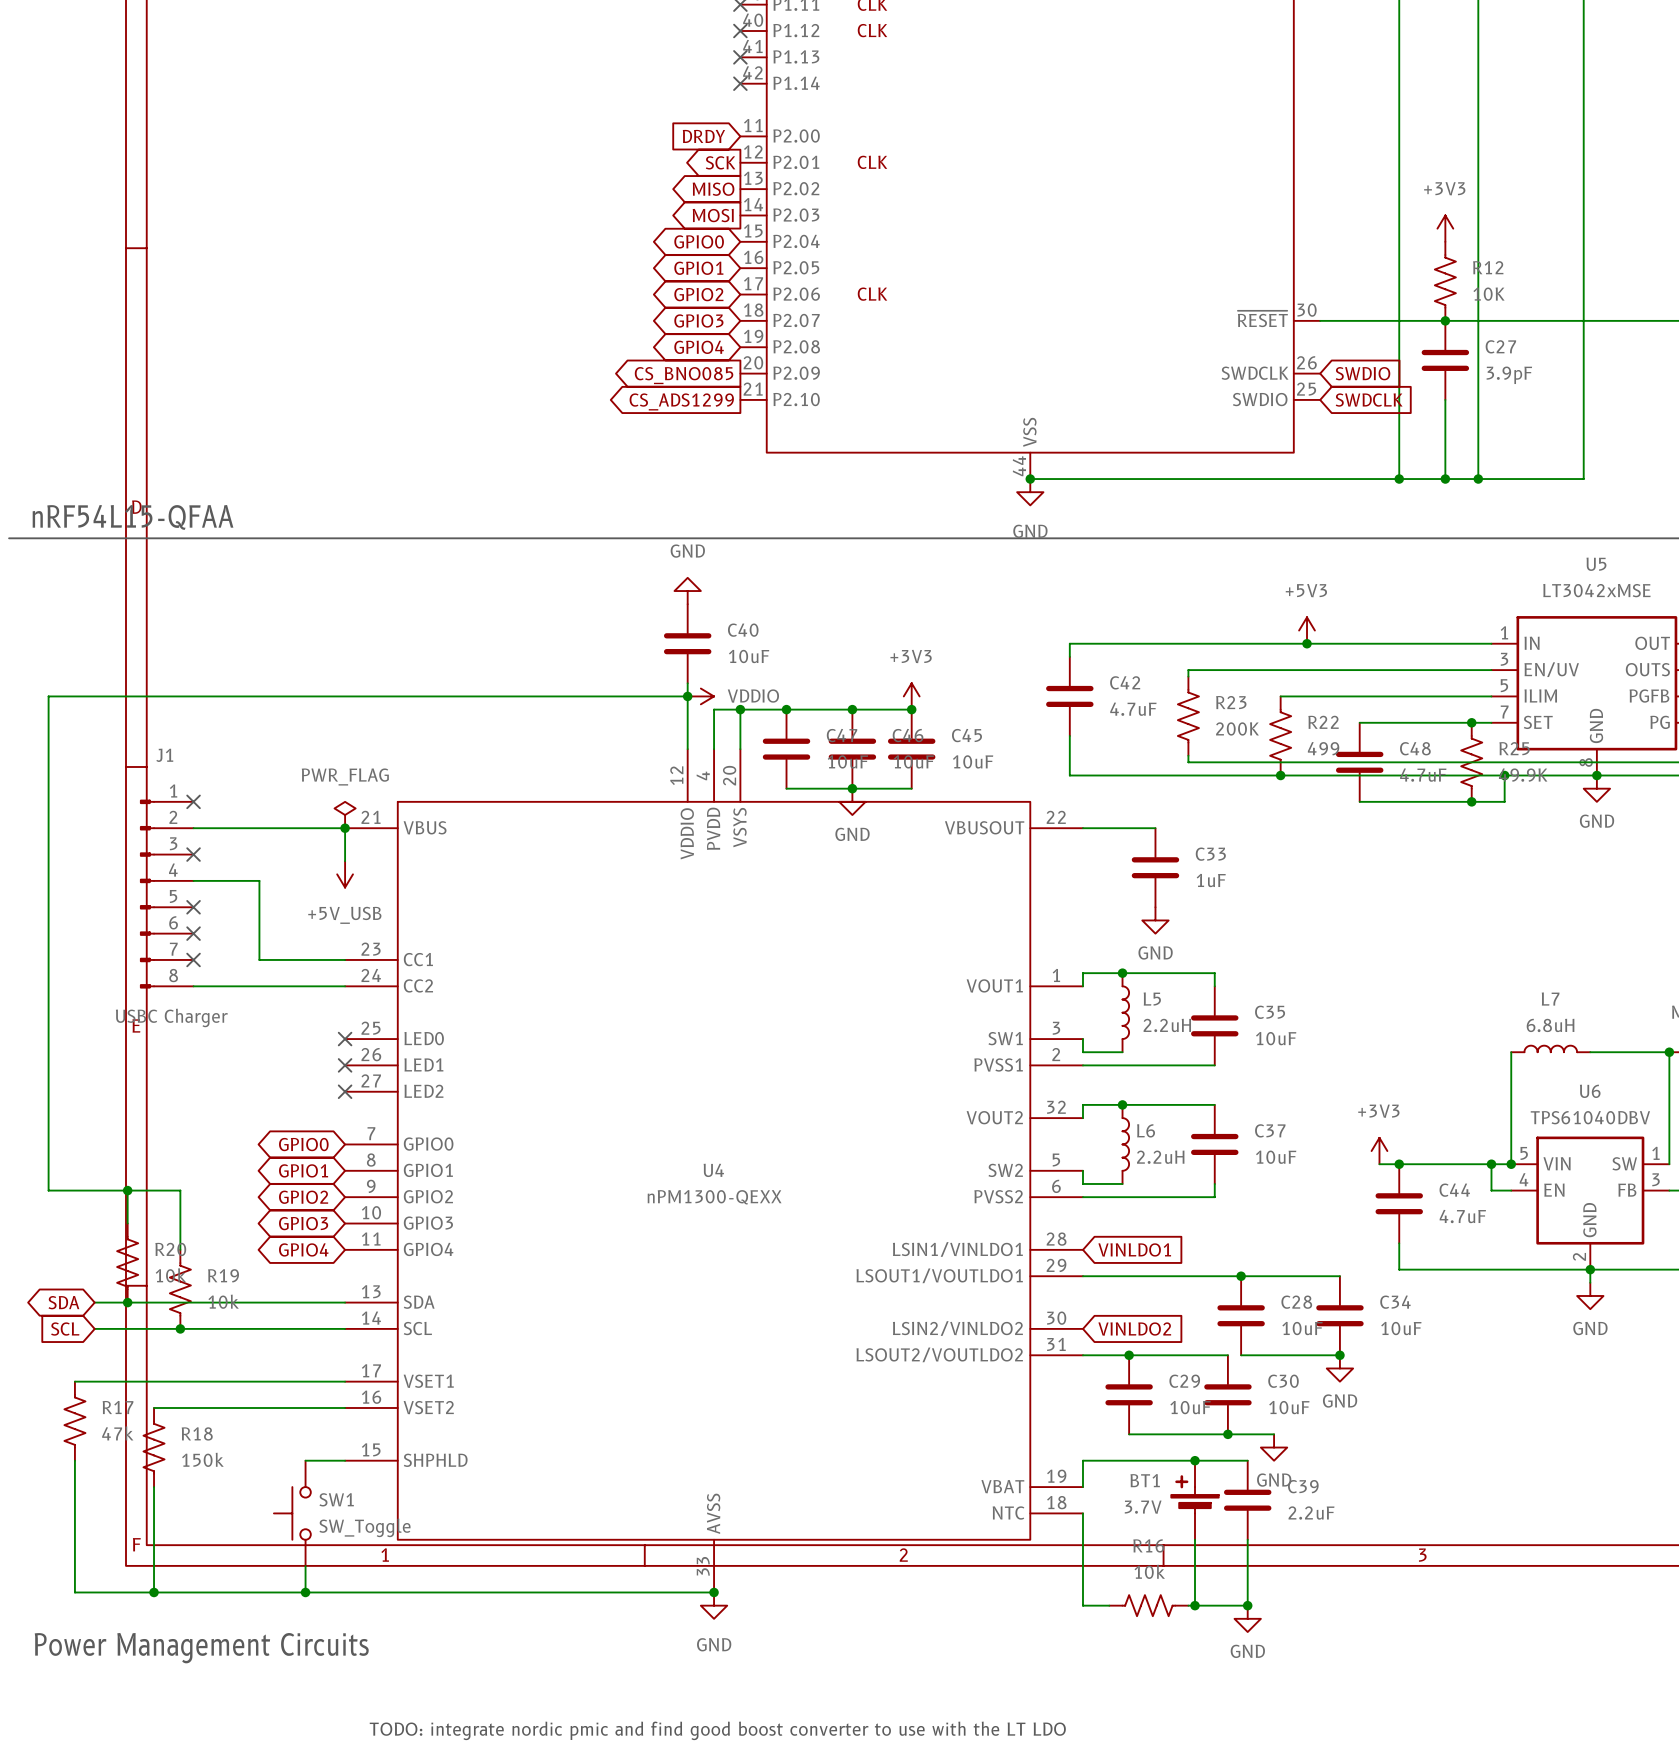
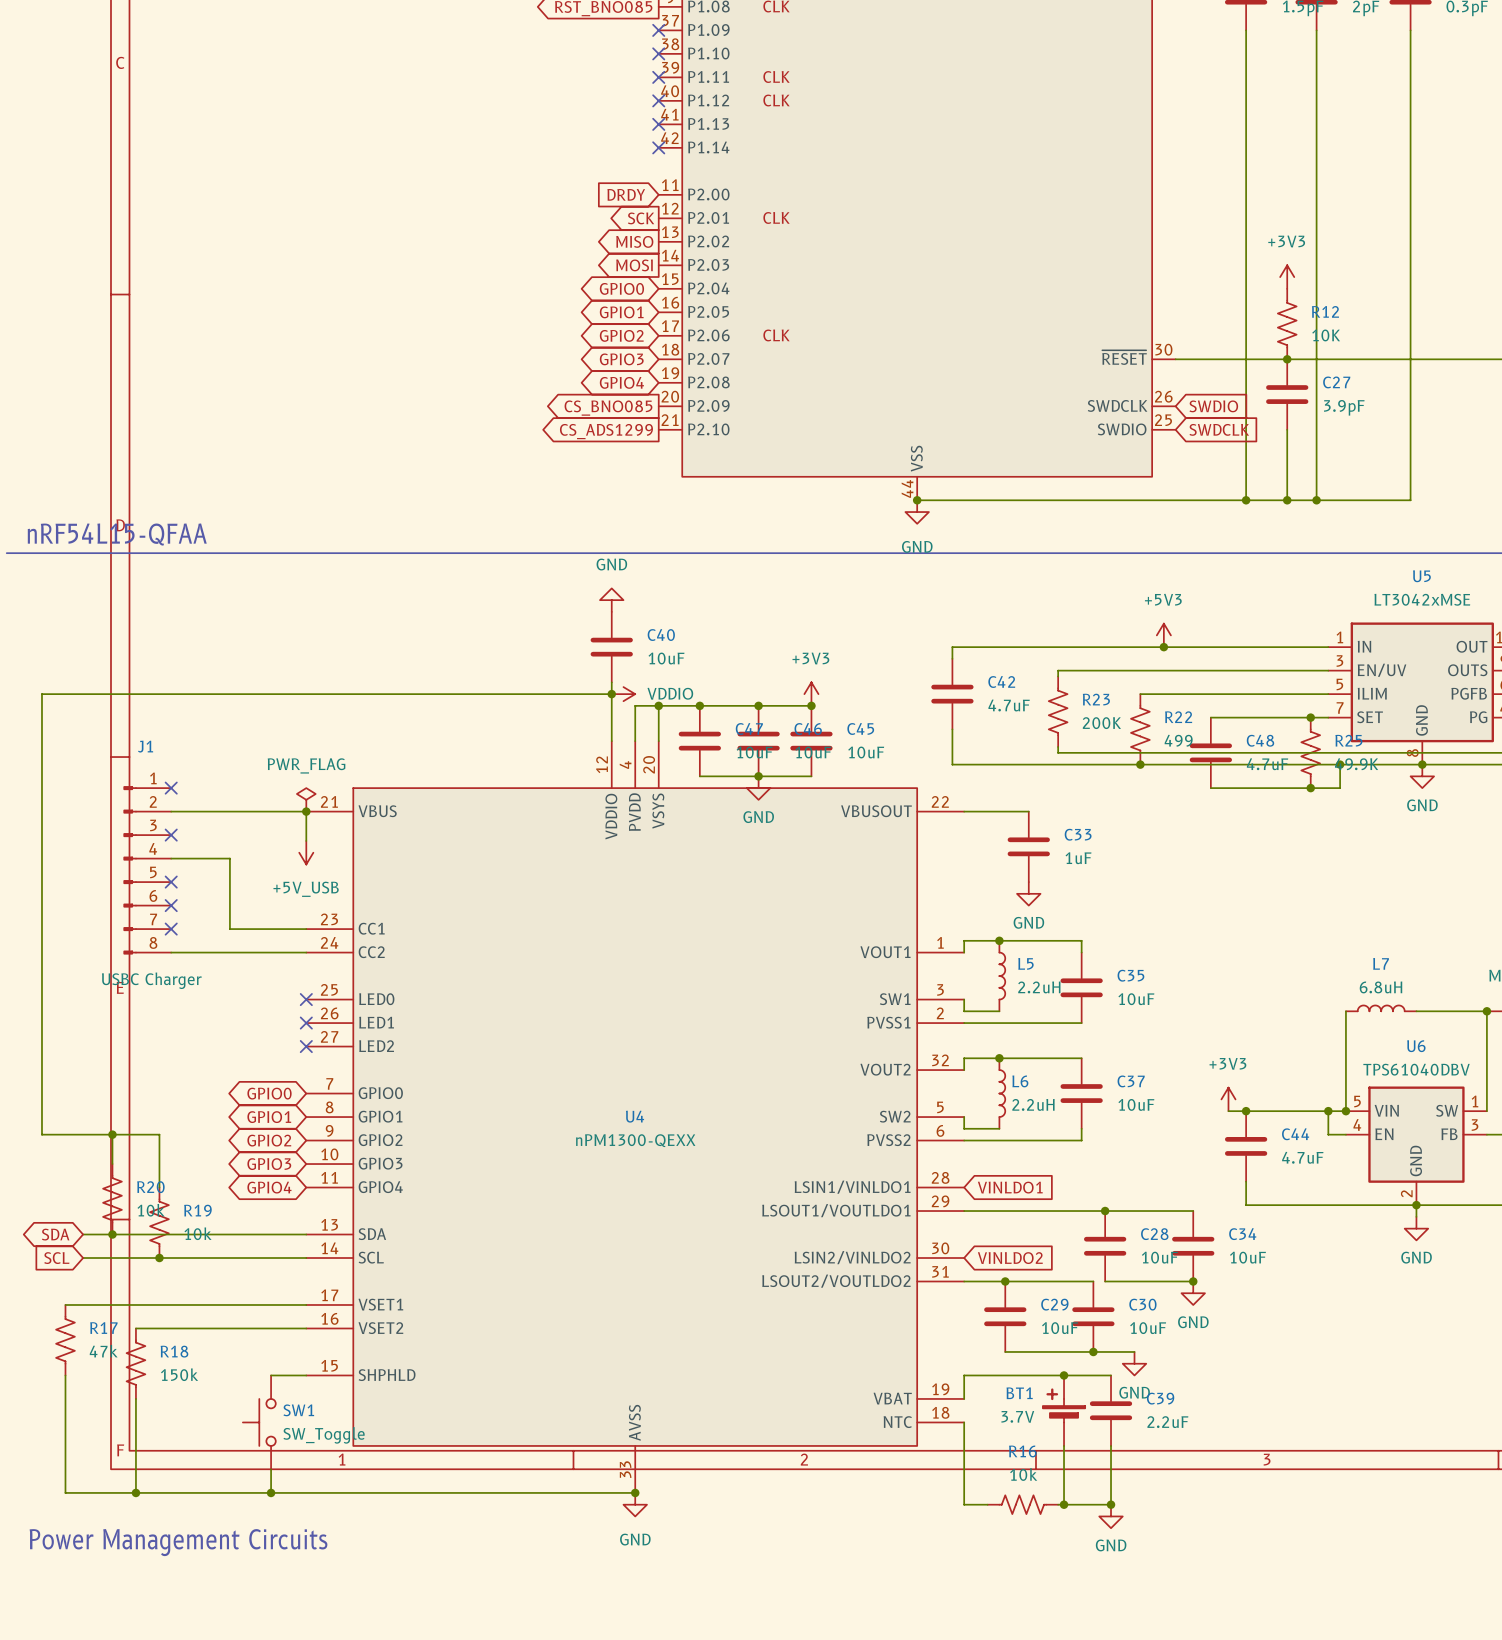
text: TODO: integrate nordic pmic and find good boost converter to use with the LT LDO (717, 1730) -> none

